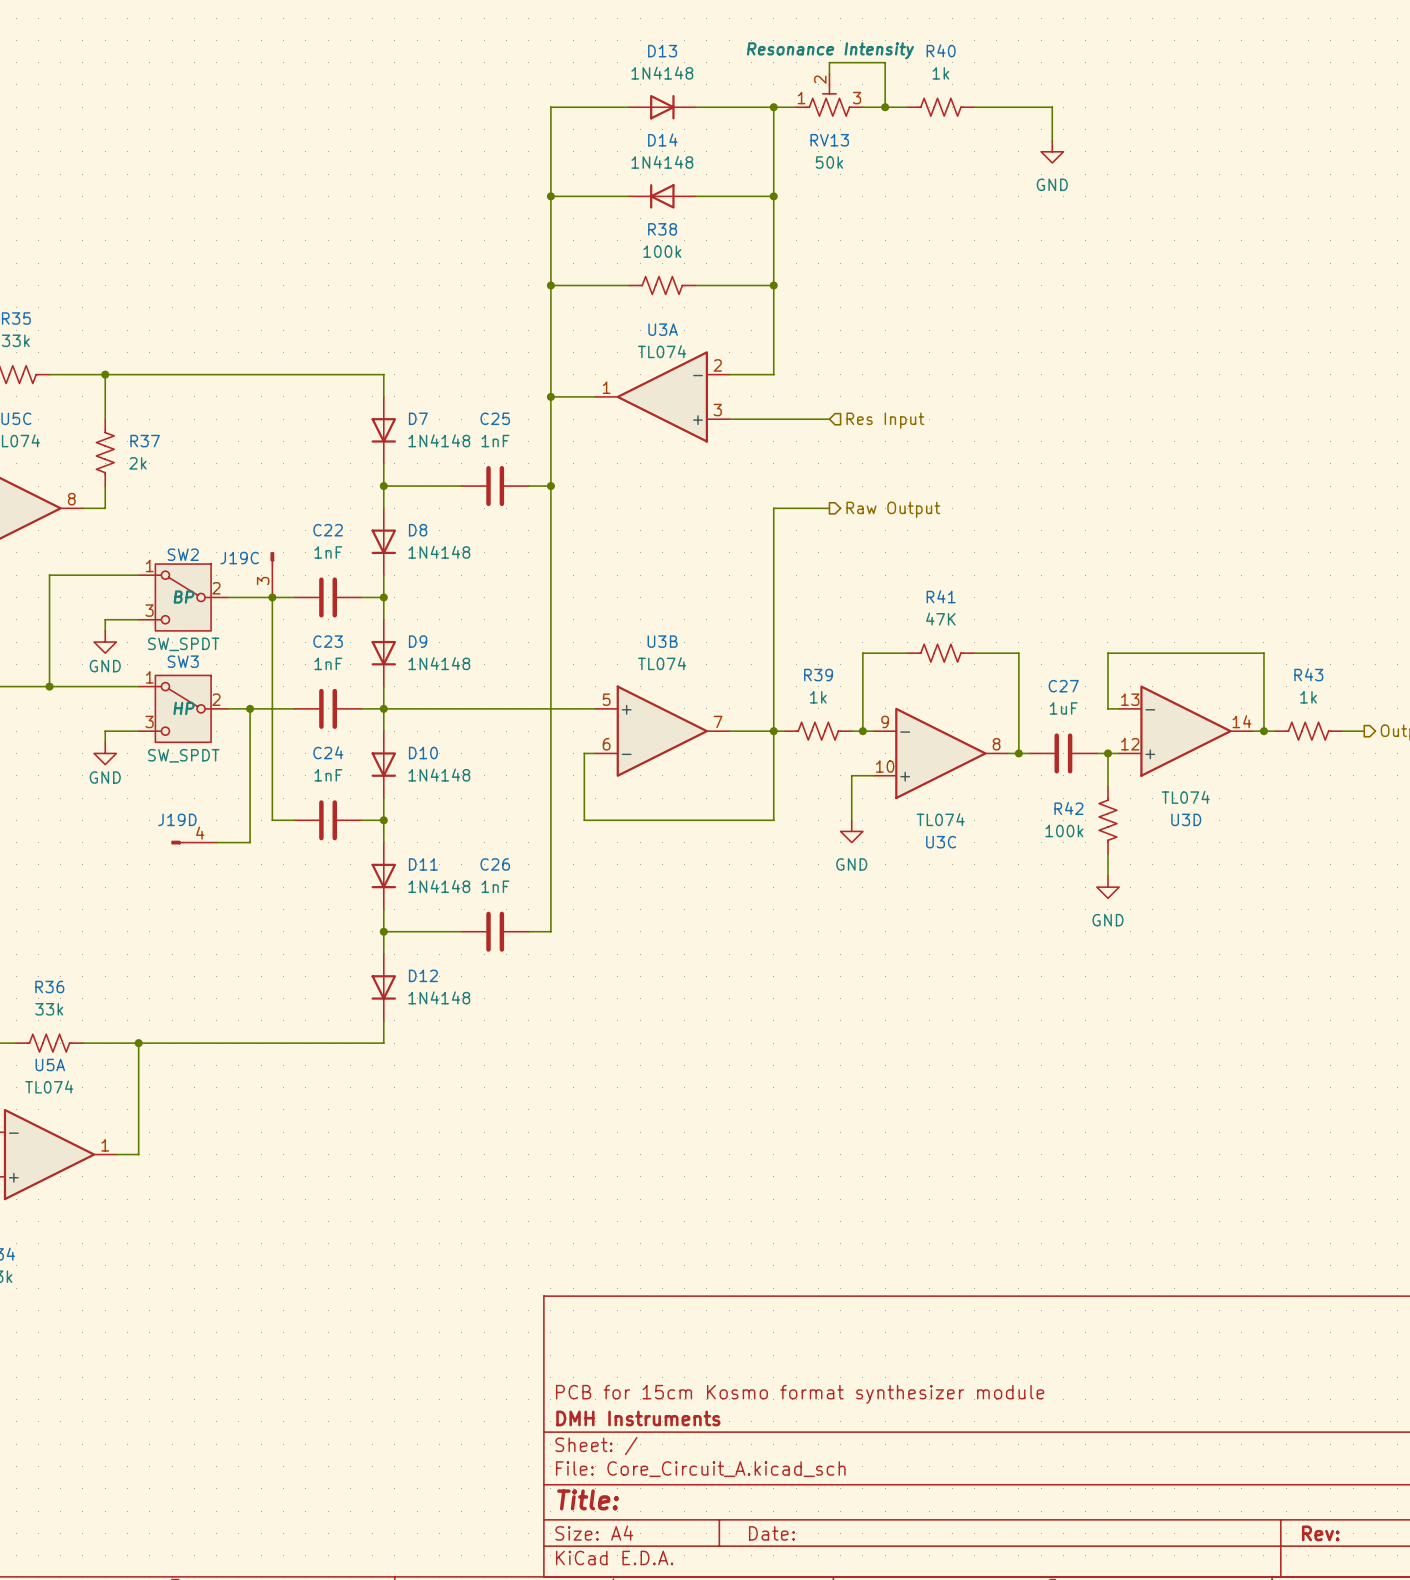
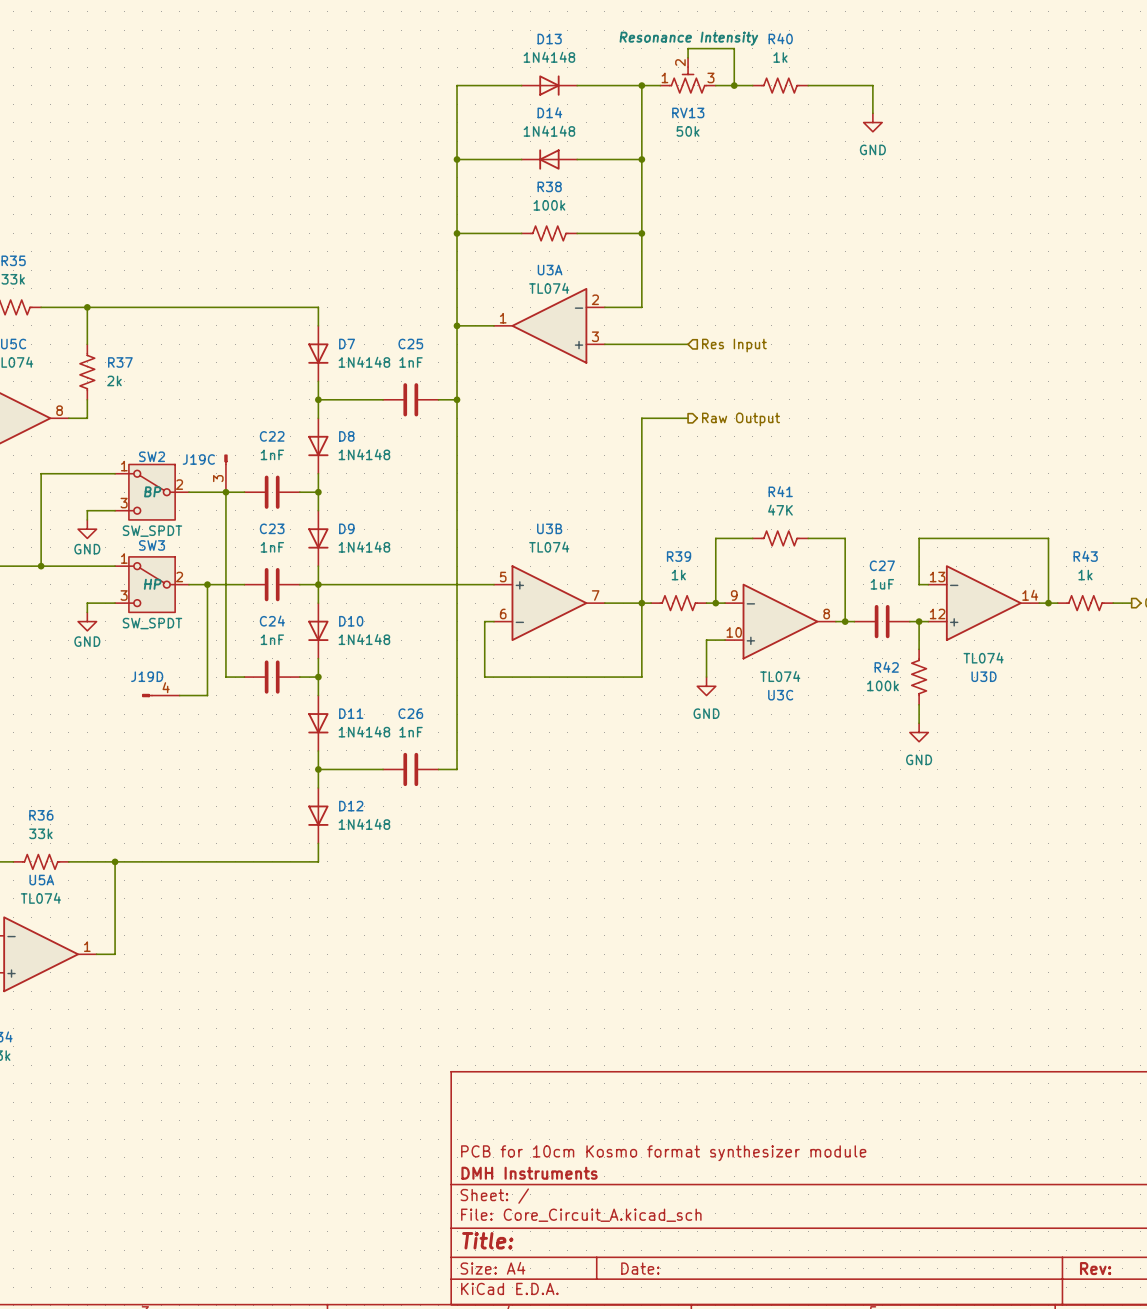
title block: PCB for 15cm Kosmo format synthesizer module (800, 1394) -> PCB for 10cm Kosmo format synthesizer module (663, 1153)

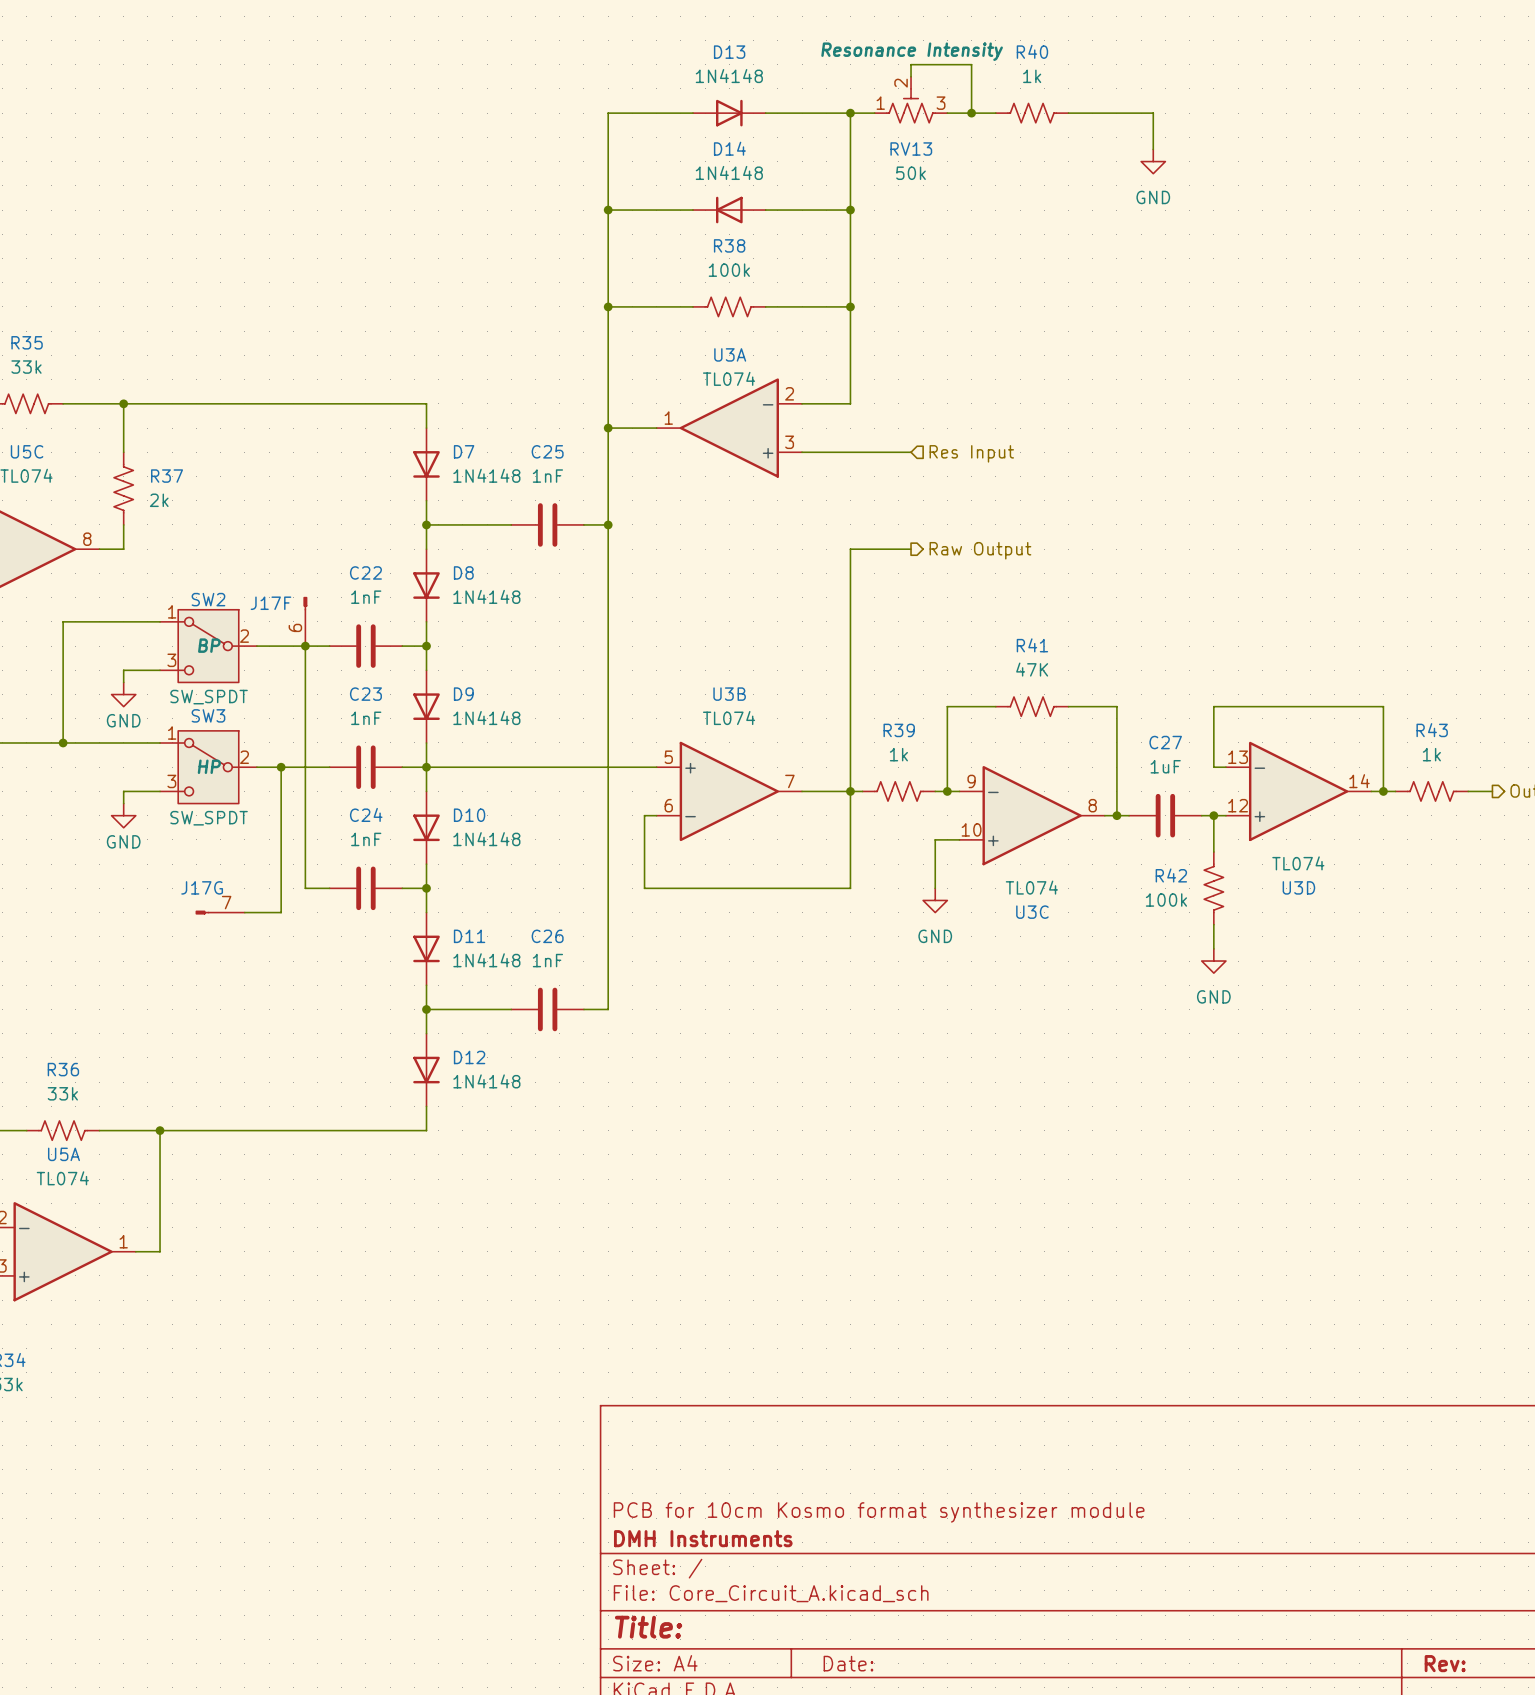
J19C name: J19C (198, 459) -> J17F (270, 603)
J19C pin number: 3 (218, 478) -> 6 (295, 627)
J19D name: J19D (147, 676) -> J17G (202, 887)
J19D pin number: 4 (166, 687) -> 7 (226, 902)

